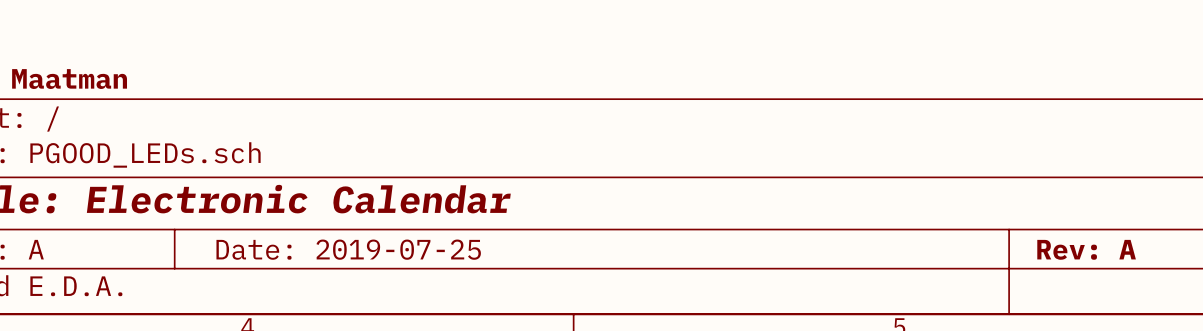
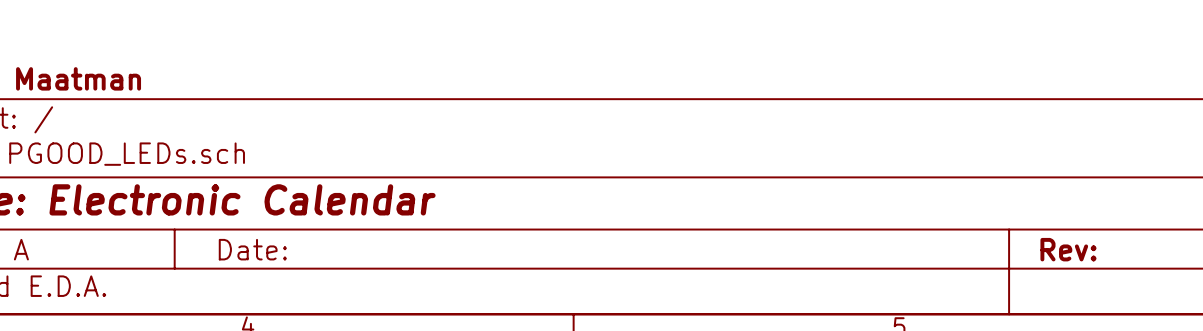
title block: Date: 2019-07-25 (348, 249) -> Date: (252, 249)
title block: Rev: A (1086, 249) -> Rev: (1068, 249)

